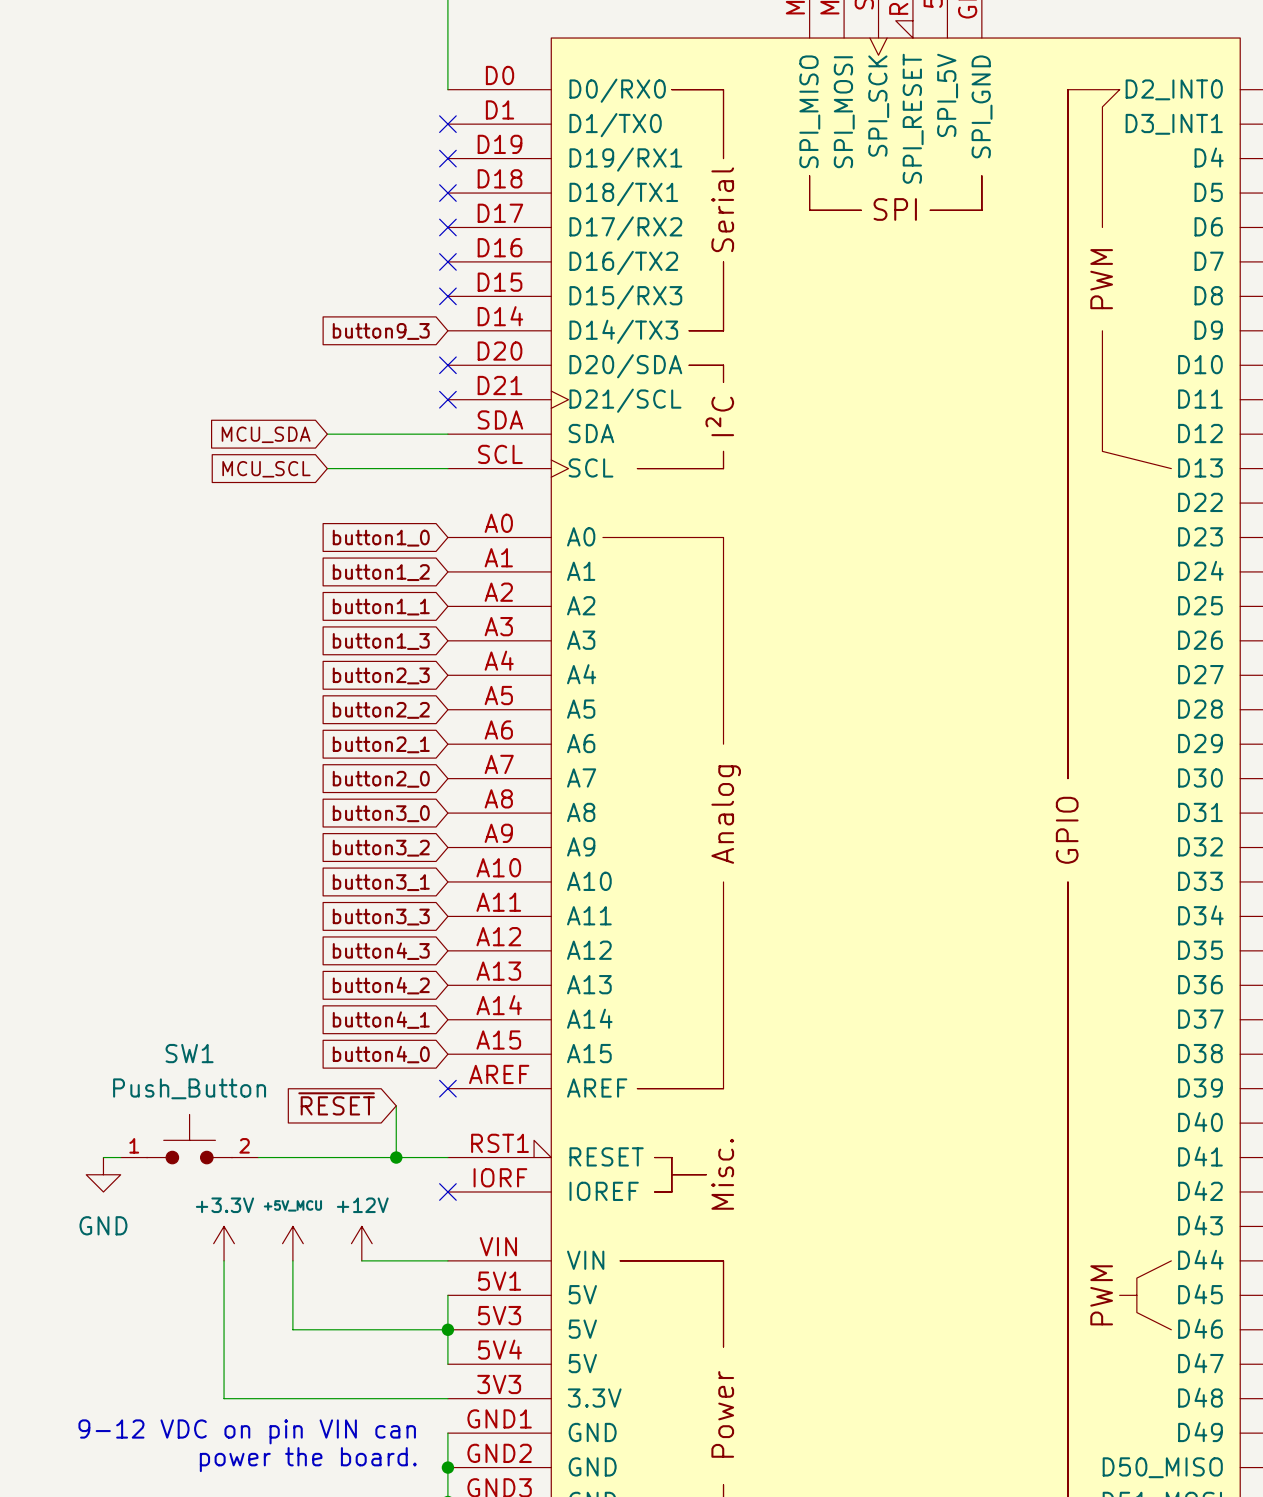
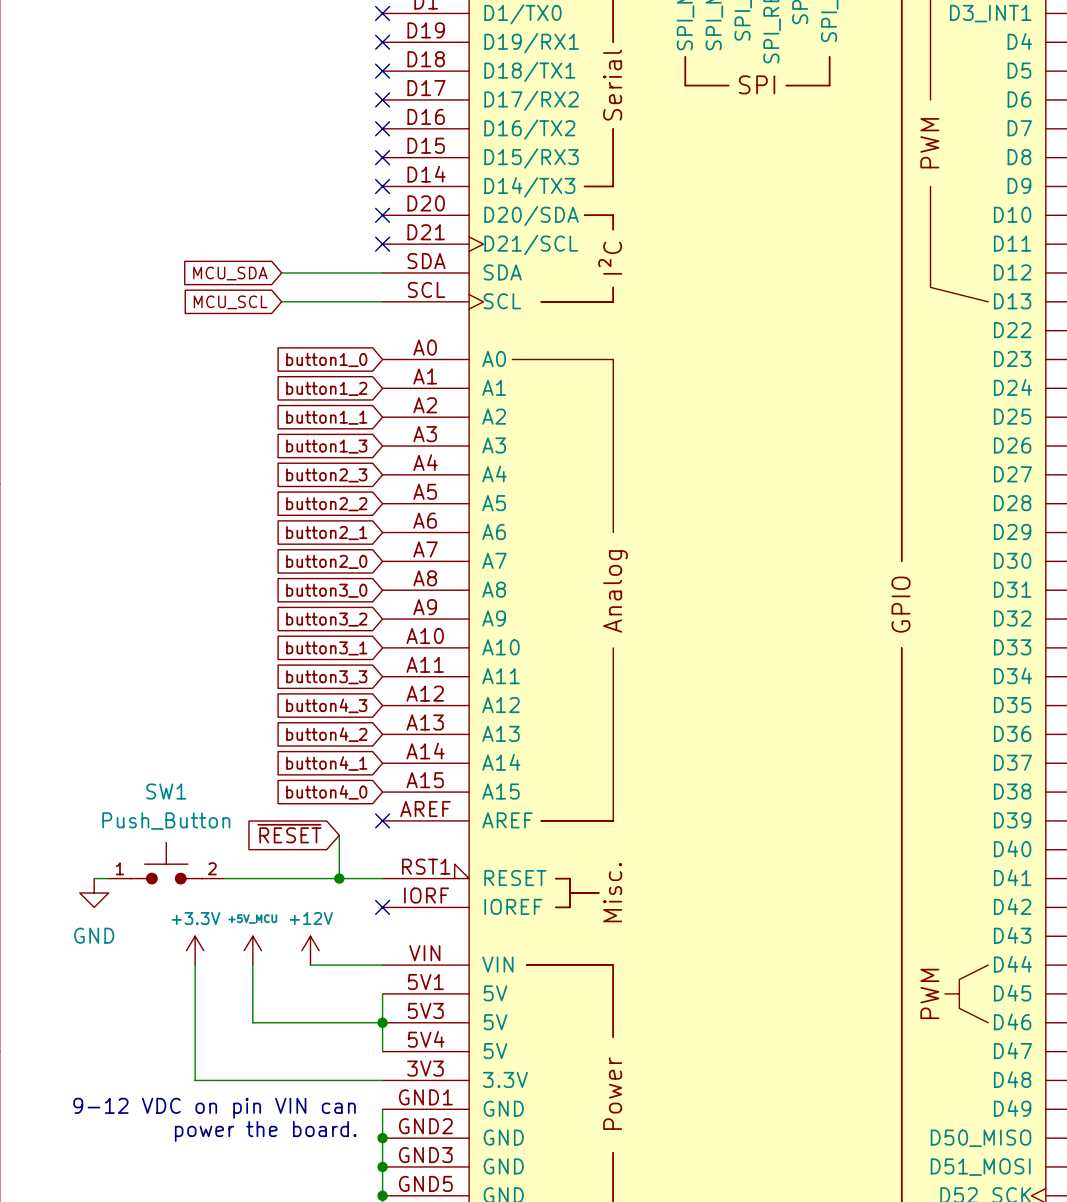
no-connect mark: none -> (382, 186)
global label: button9_3 (381, 331) -> none

